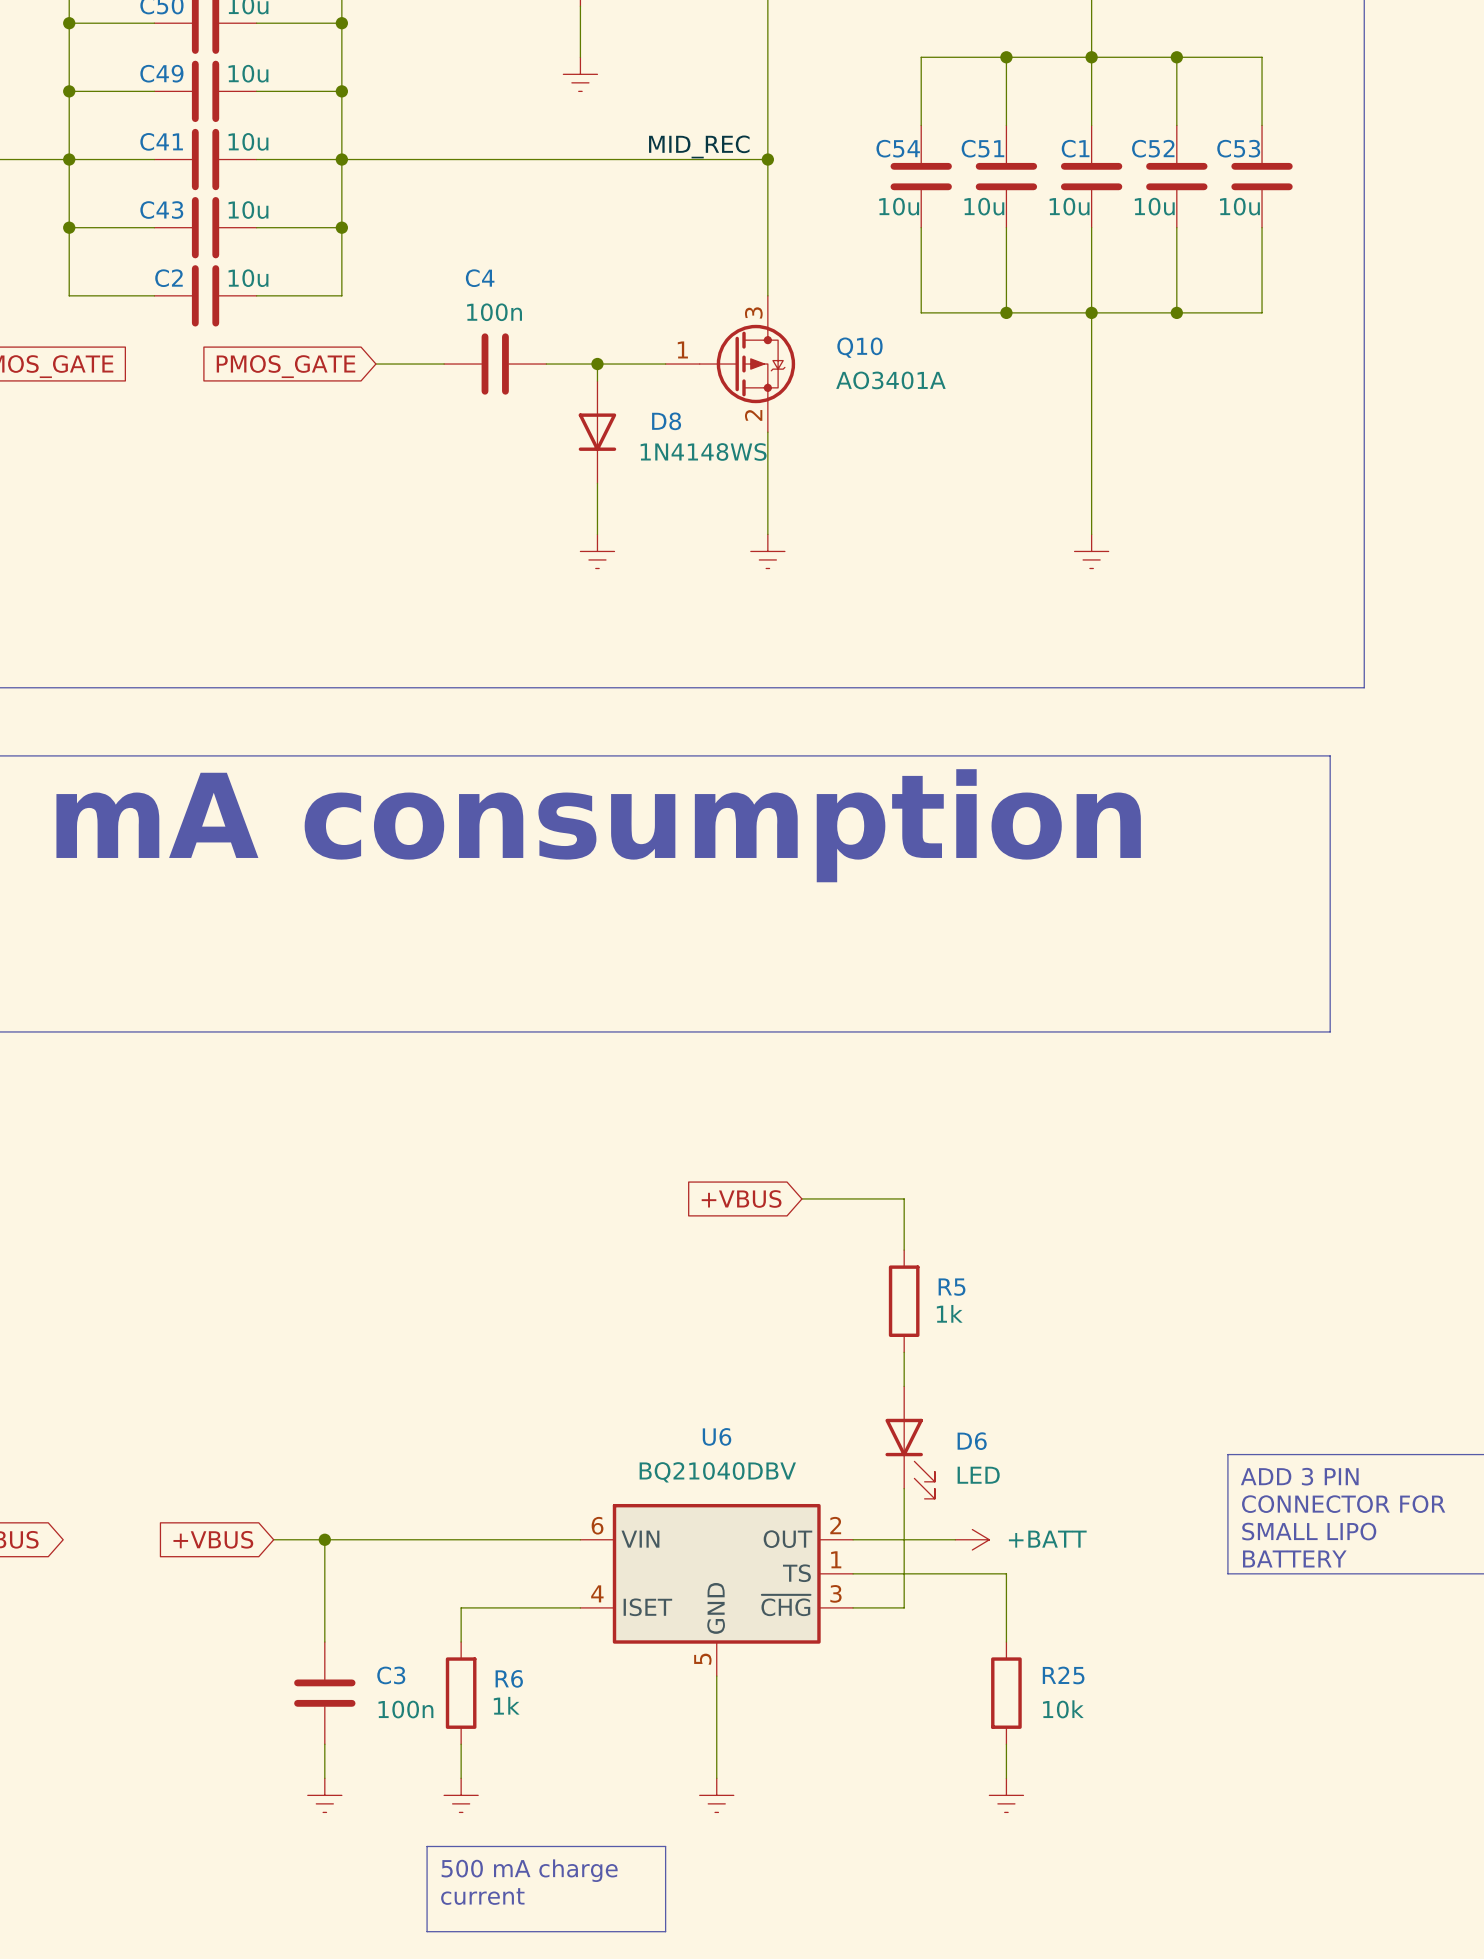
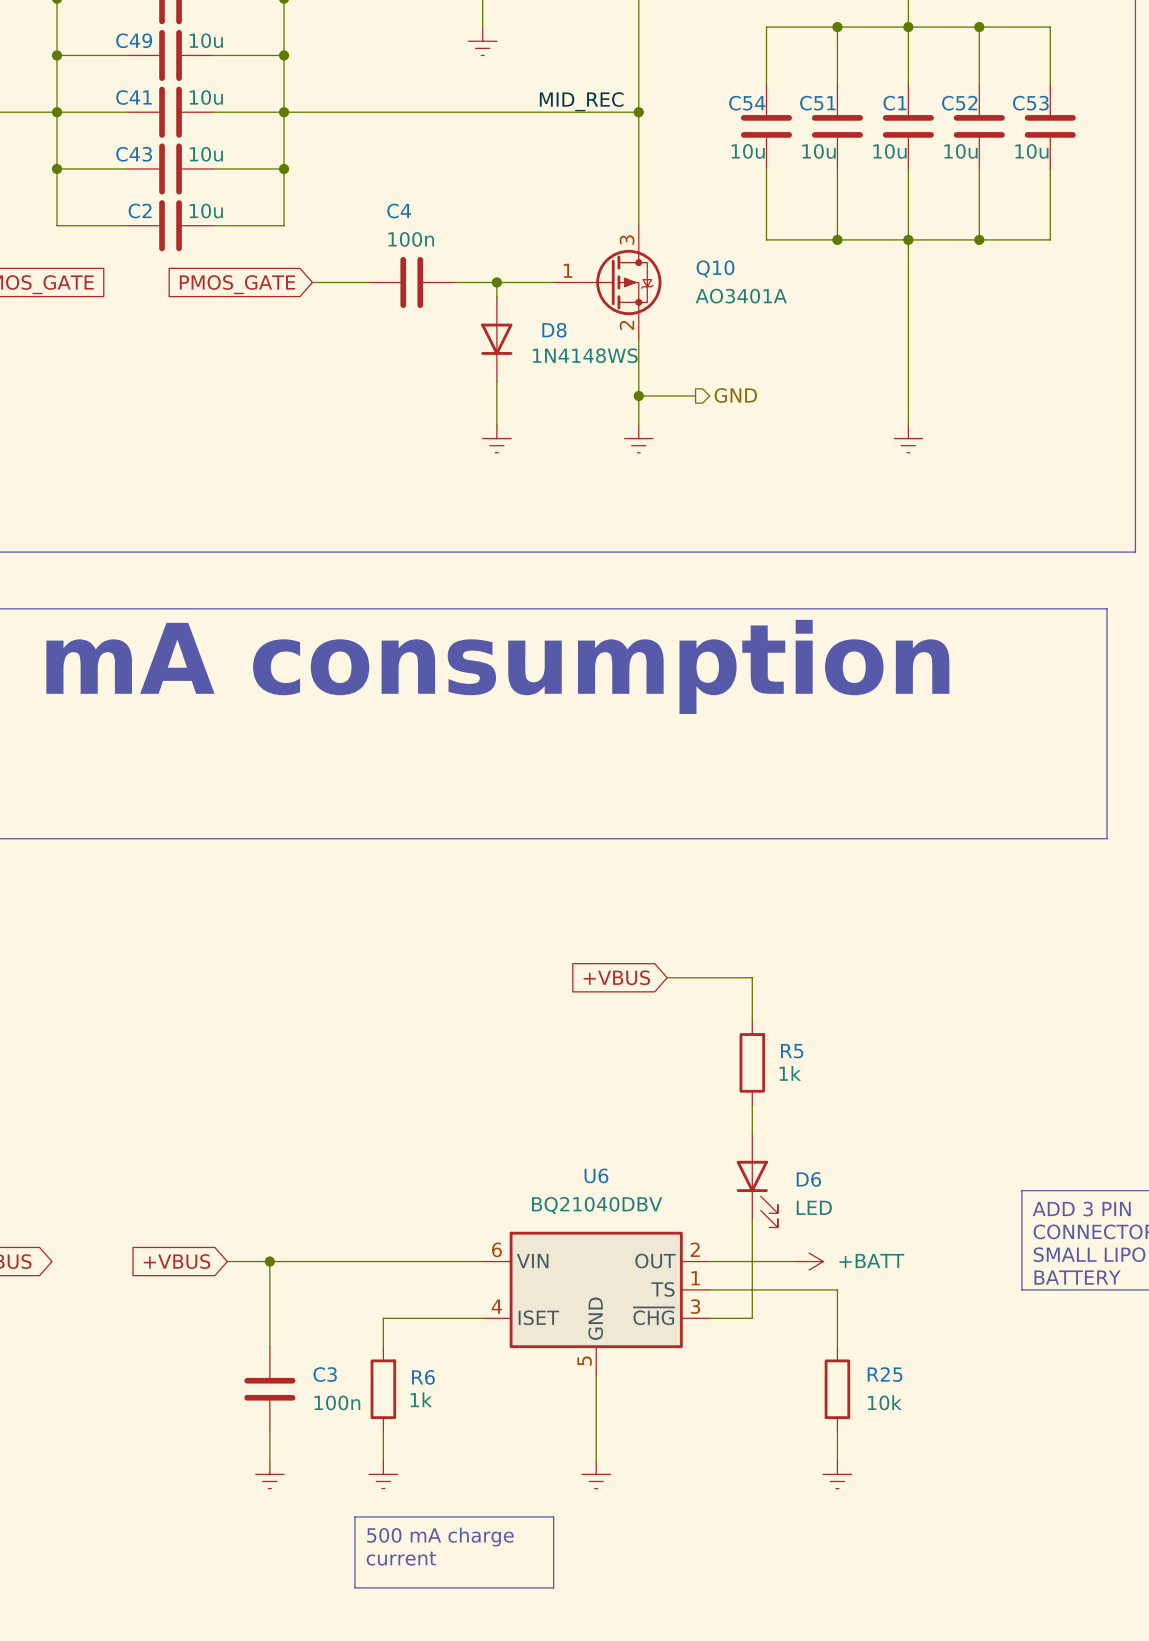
hierarchical label: none -> GND (735, 395)
wire: none -> (638, 396) (695, 396)
junction: none -> (638, 396)

